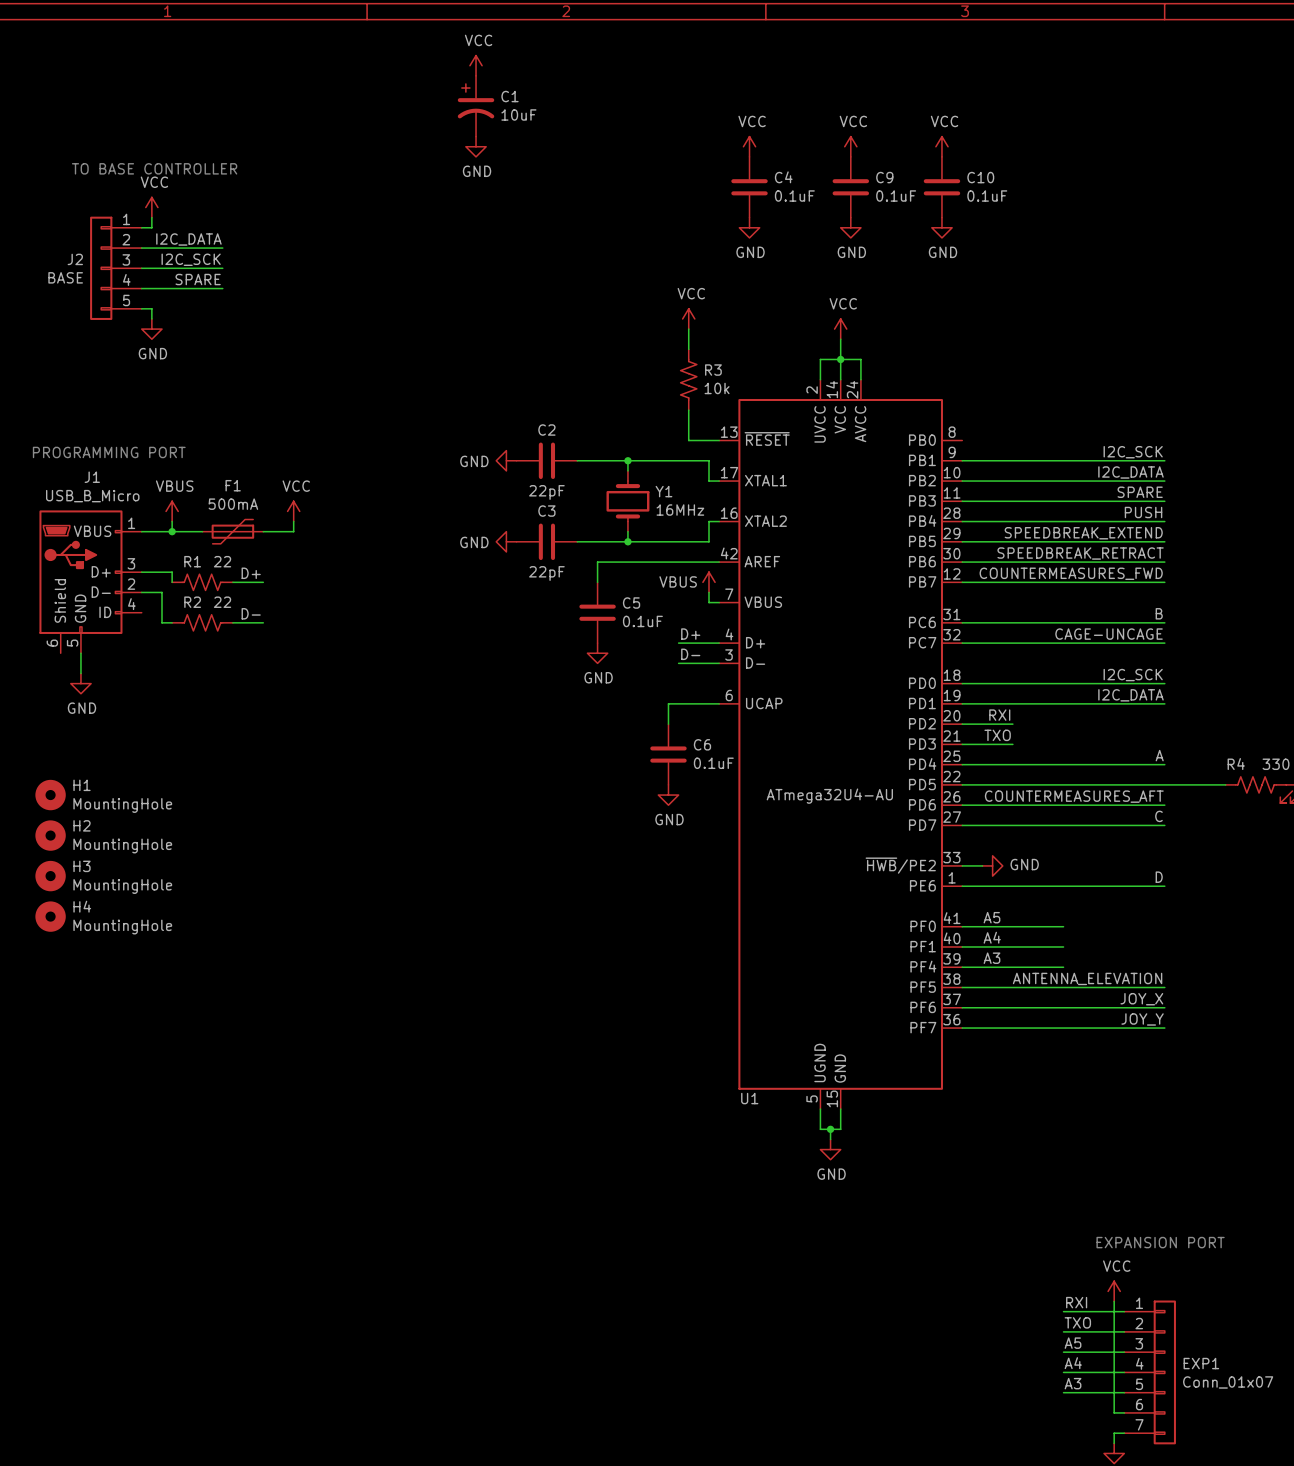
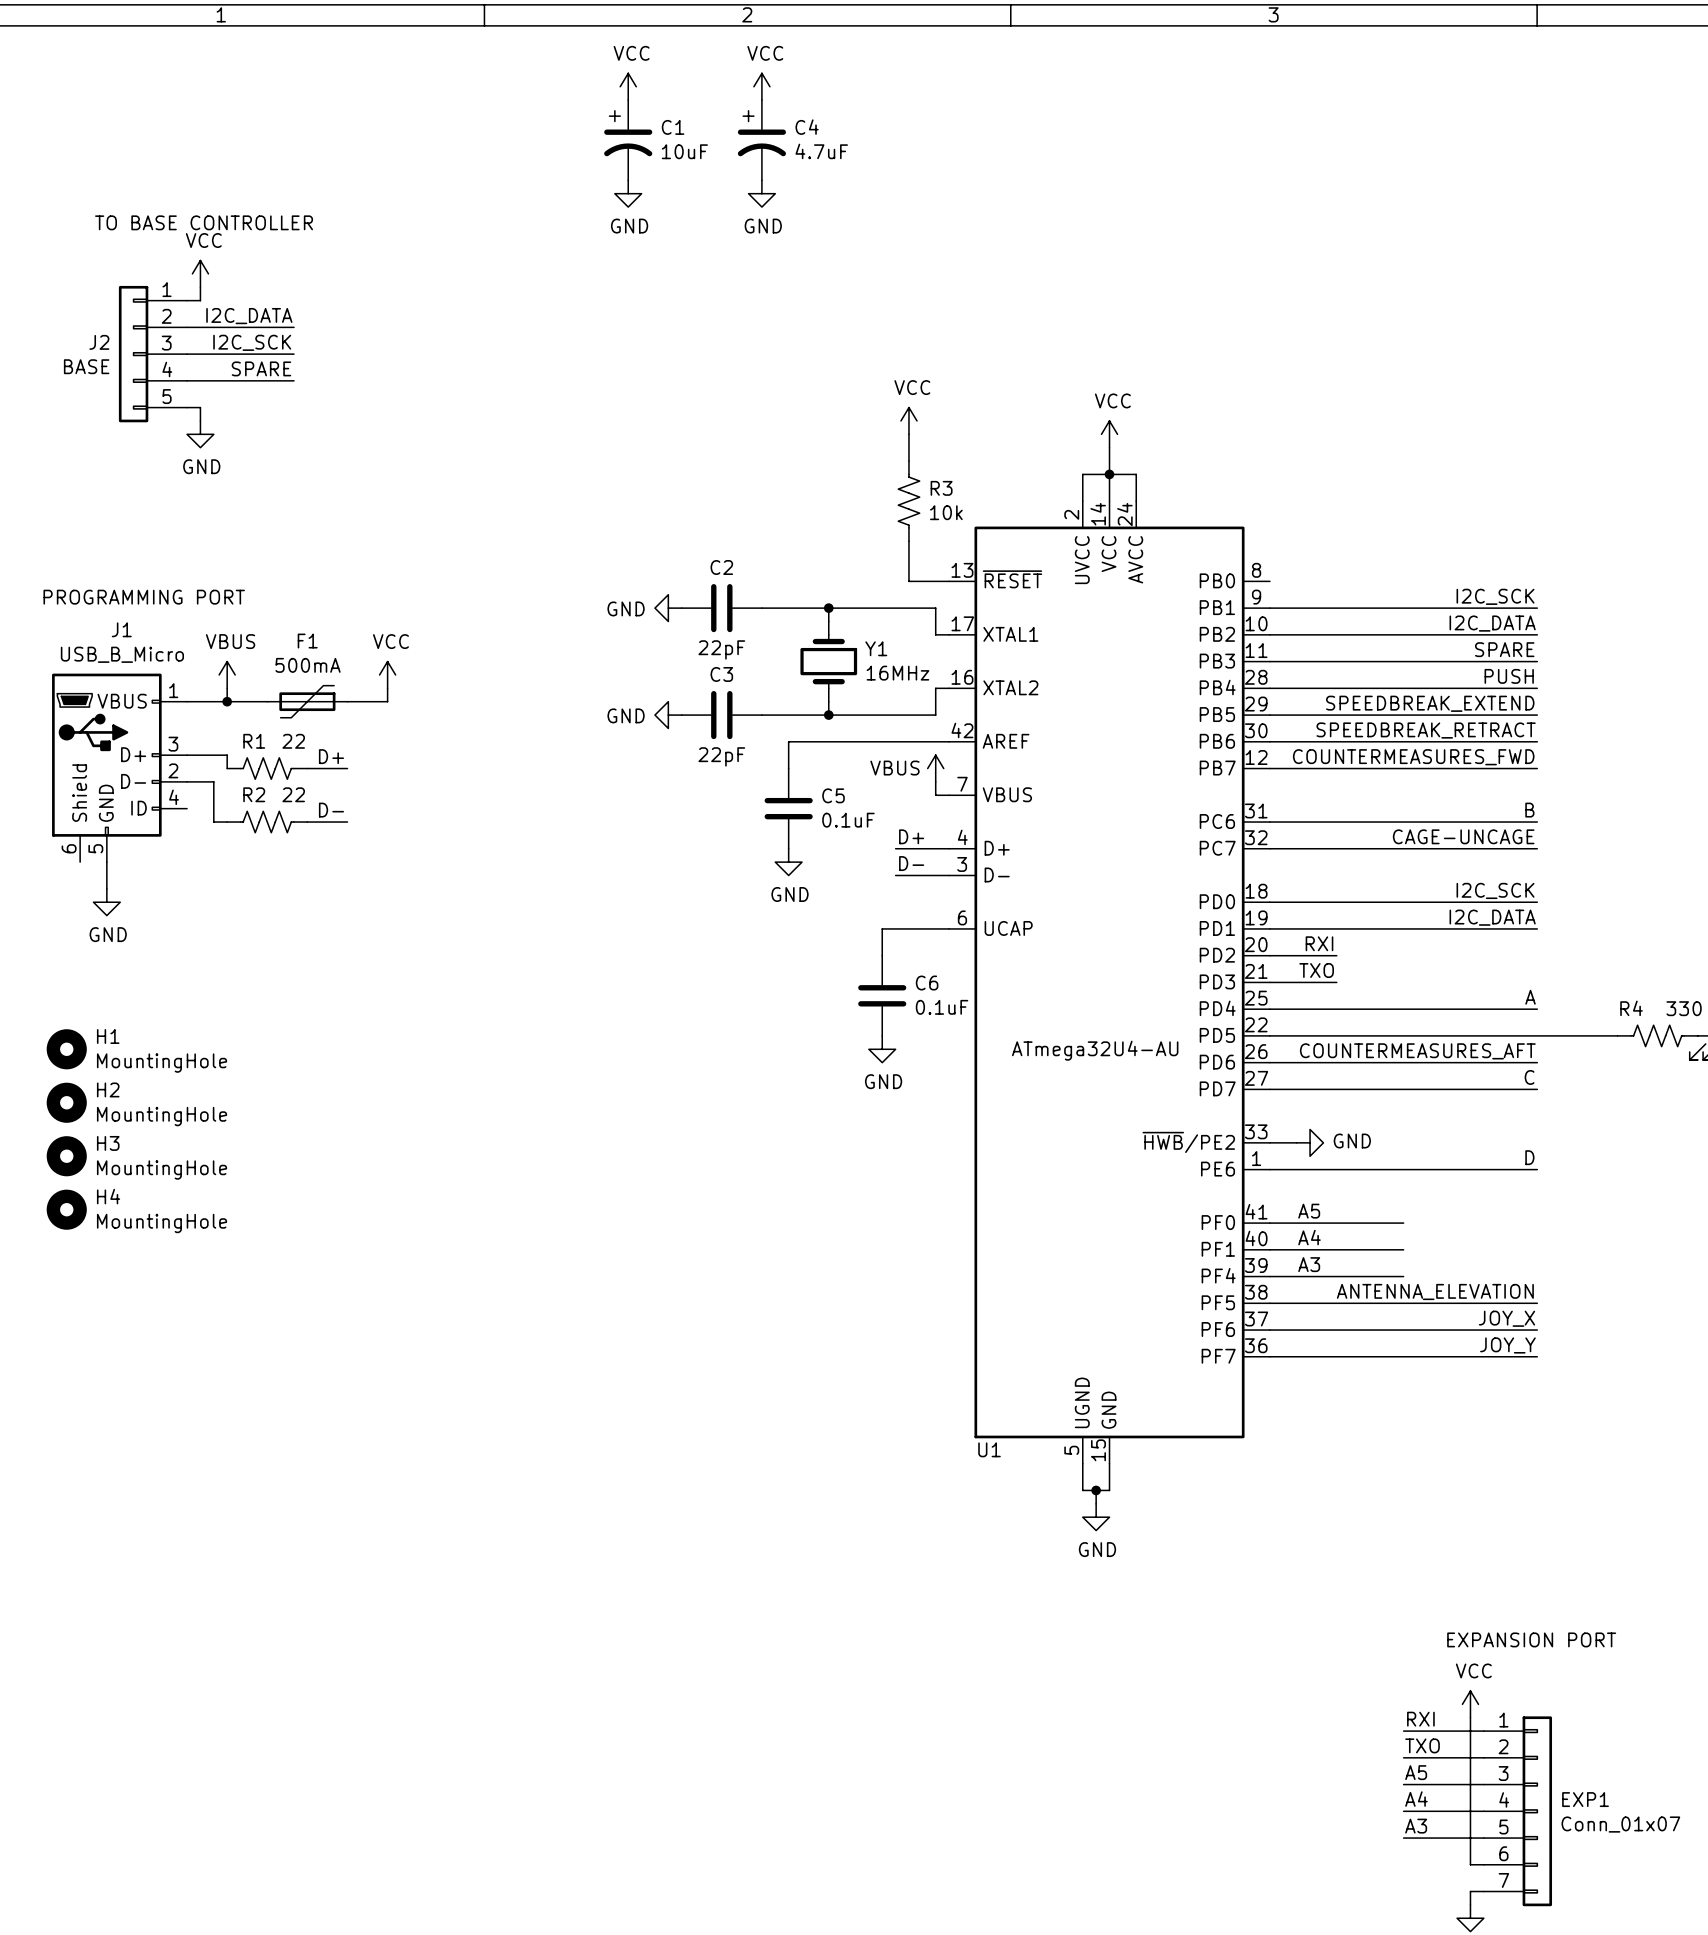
power symbol: none -> VCC (761, 86)
power symbol: none -> GND (761, 193)
power symbol: VCC (749, 146) -> none
power symbol: VCC (850, 146) -> none
power symbol: VCC (941, 146) -> none
C4 symbol: [731, 156, 768, 218] -> [737, 100, 786, 181]
C9: 0.1uF (850, 187) -> none
C10: 0.1uF (941, 187) -> none
C4 value: 0.1uF (794, 196) -> 4.7uF (821, 151)
power symbol: GND (749, 227) -> none
power symbol: GND (850, 227) -> none
power symbol: GND (941, 227) -> none

